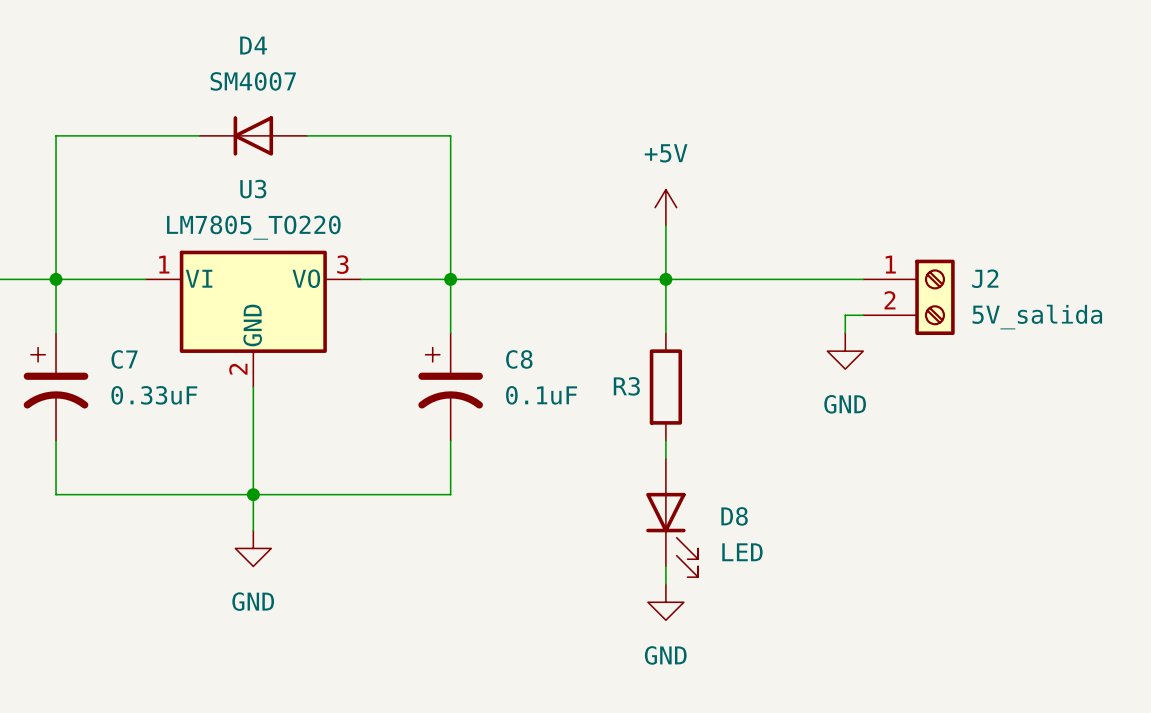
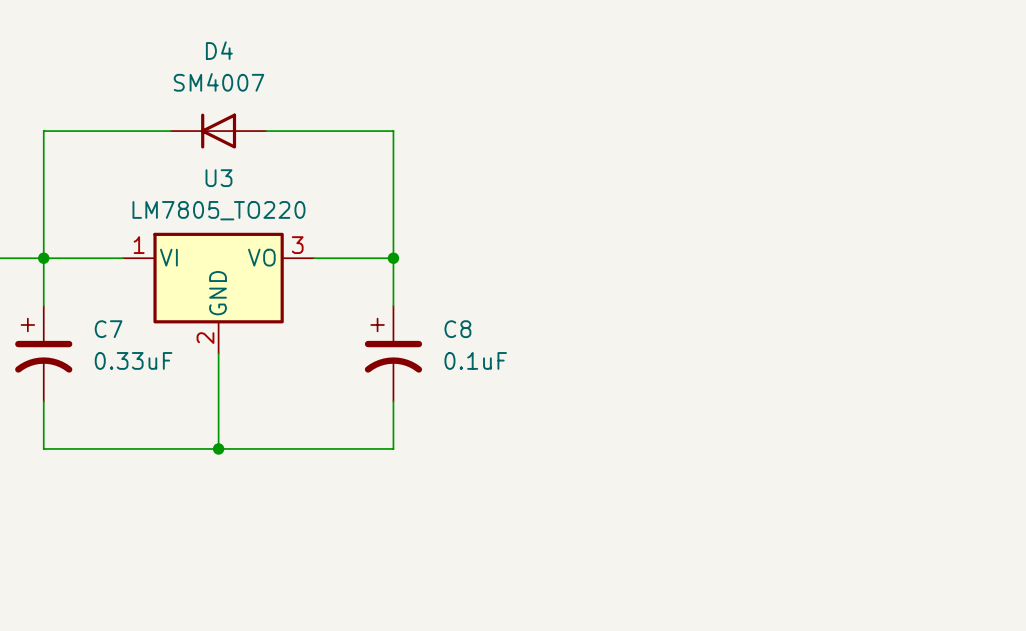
power symbol: +5V (665, 207) -> none
wire: (665, 225) (665, 333) -> none
wire: (450, 279) (863, 279) -> none
junction: (665, 279) -> none
J2: 5V_salida (908, 297) -> none
wire: (863, 315) (845, 315) (845, 333) -> none
power symbol: GND (845, 351) -> none
R3: (665, 387) -> none
wire: (665, 440) (665, 458) -> none
wire: (253, 494) (253, 530) -> none
D8: LED (672, 517) -> none
power symbol: GND (253, 548) -> none
wire: (665, 566) (665, 584) -> none
power symbol: GND (665, 602) -> none

